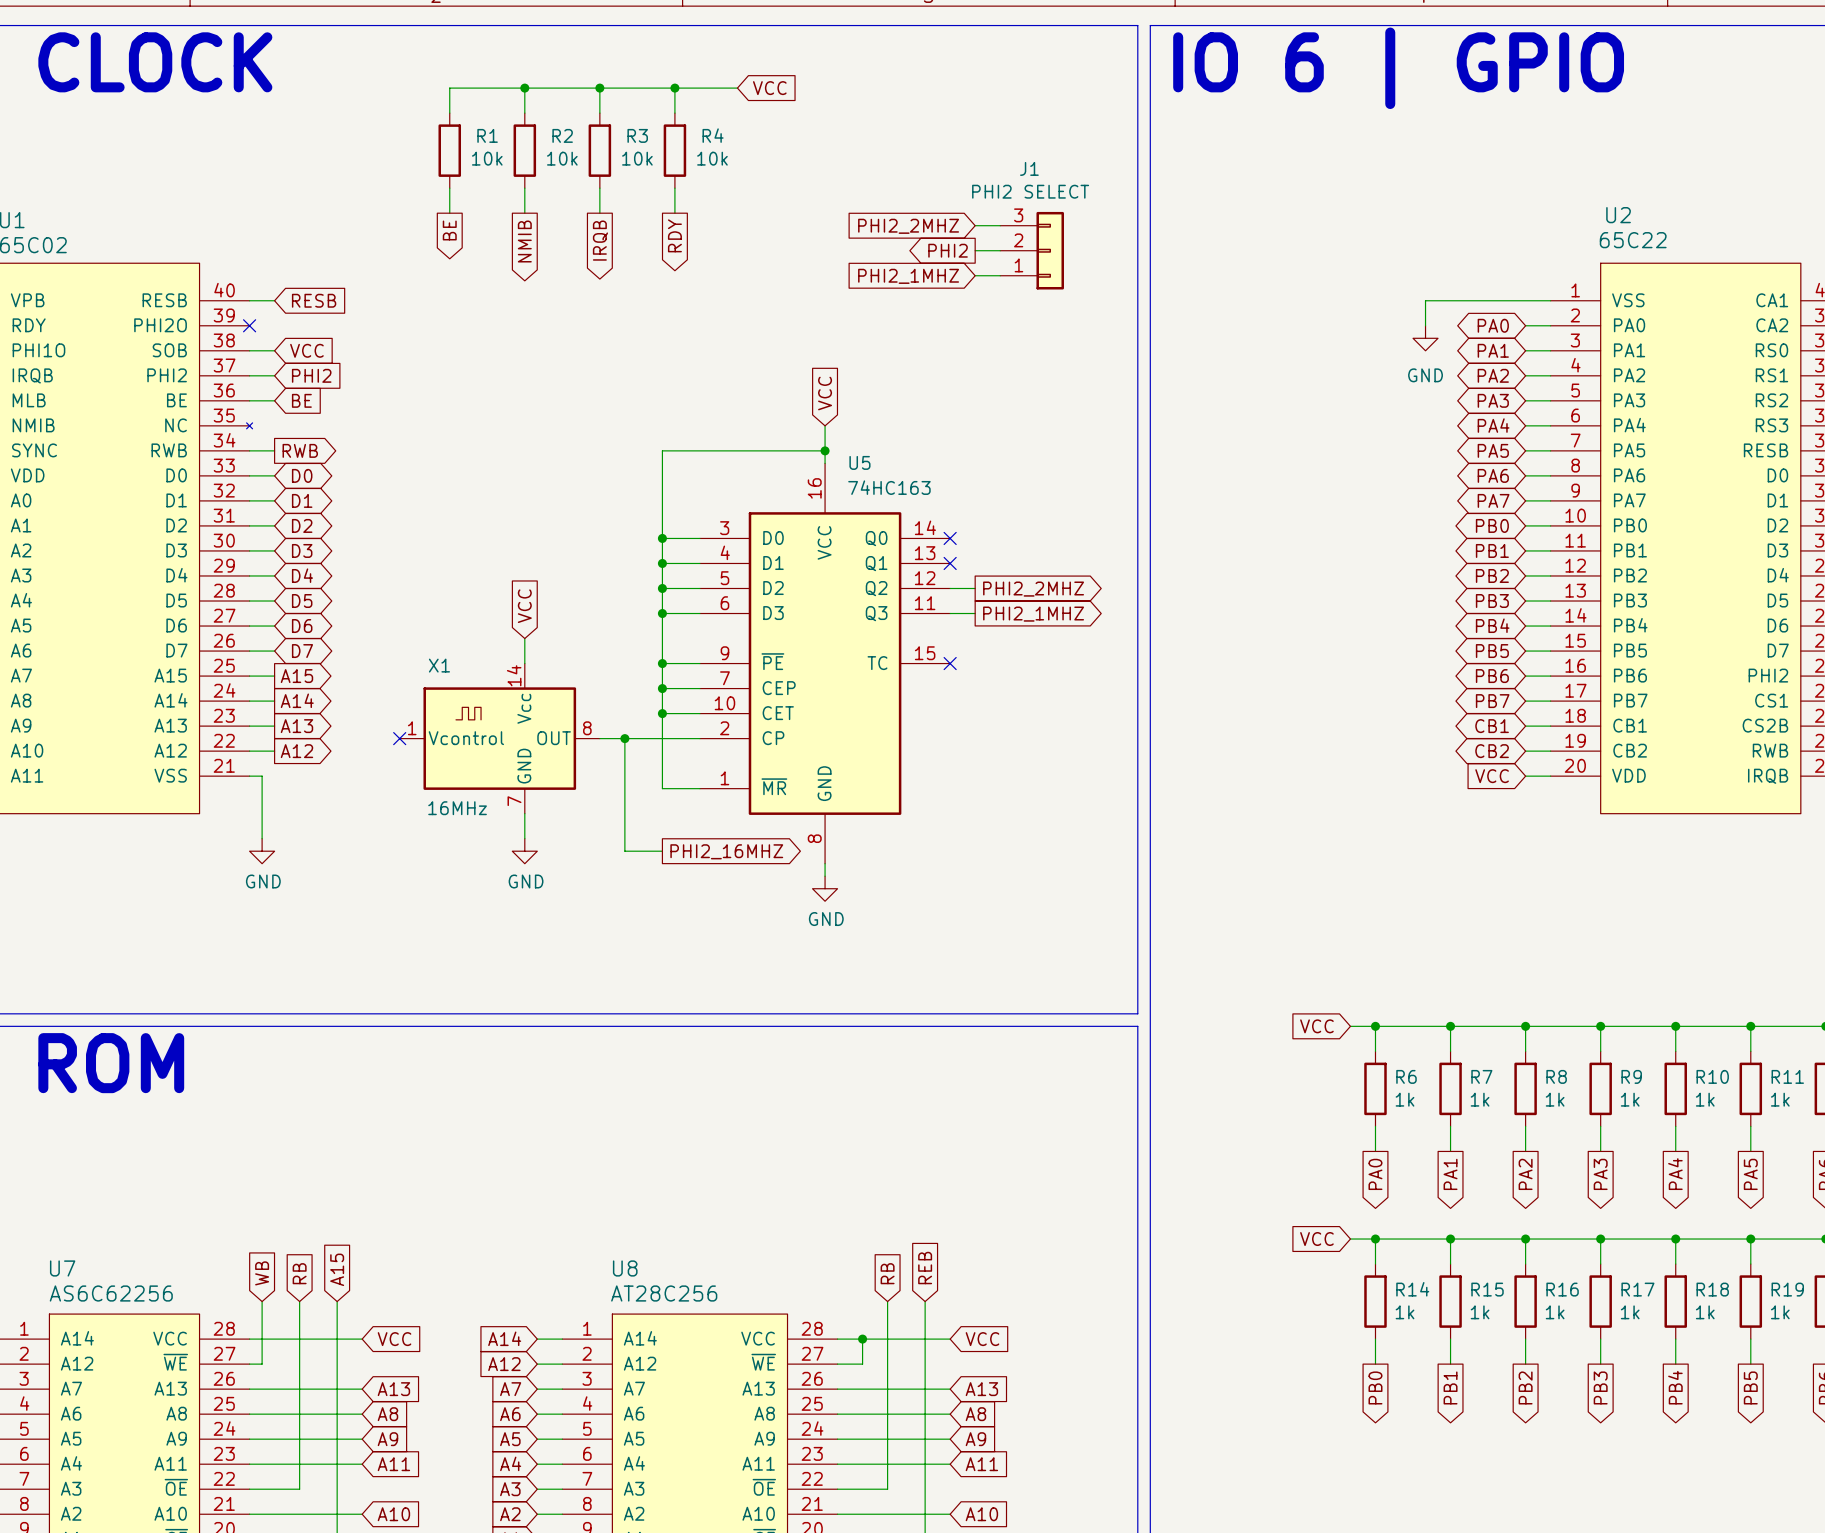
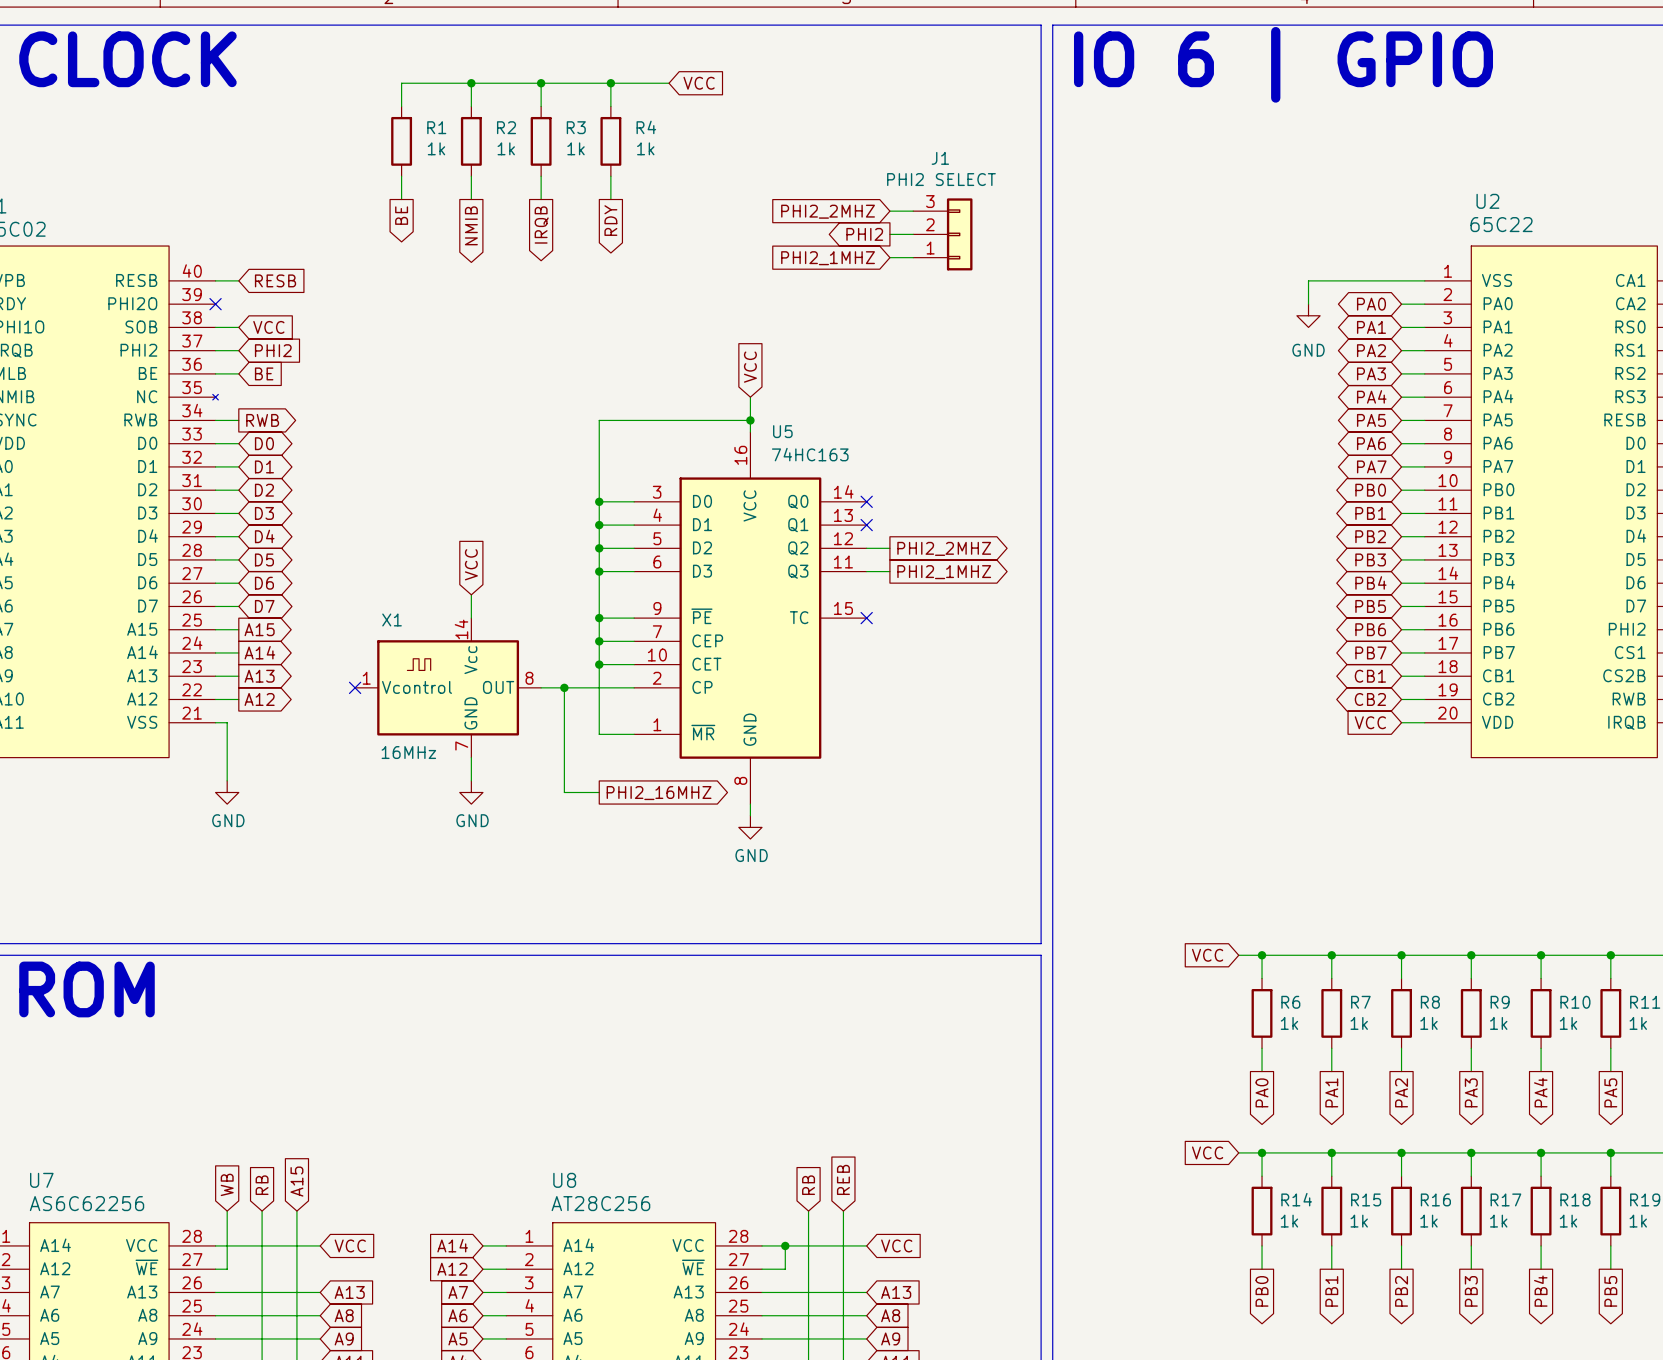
R1 value: 10k (487, 158) -> 1k (436, 148)
R2 value: 10k (562, 158) -> 1k (506, 148)
R3 value: 10k (637, 158) -> 1k (576, 148)
R4 value: 10k (712, 158) -> 1k (645, 148)

